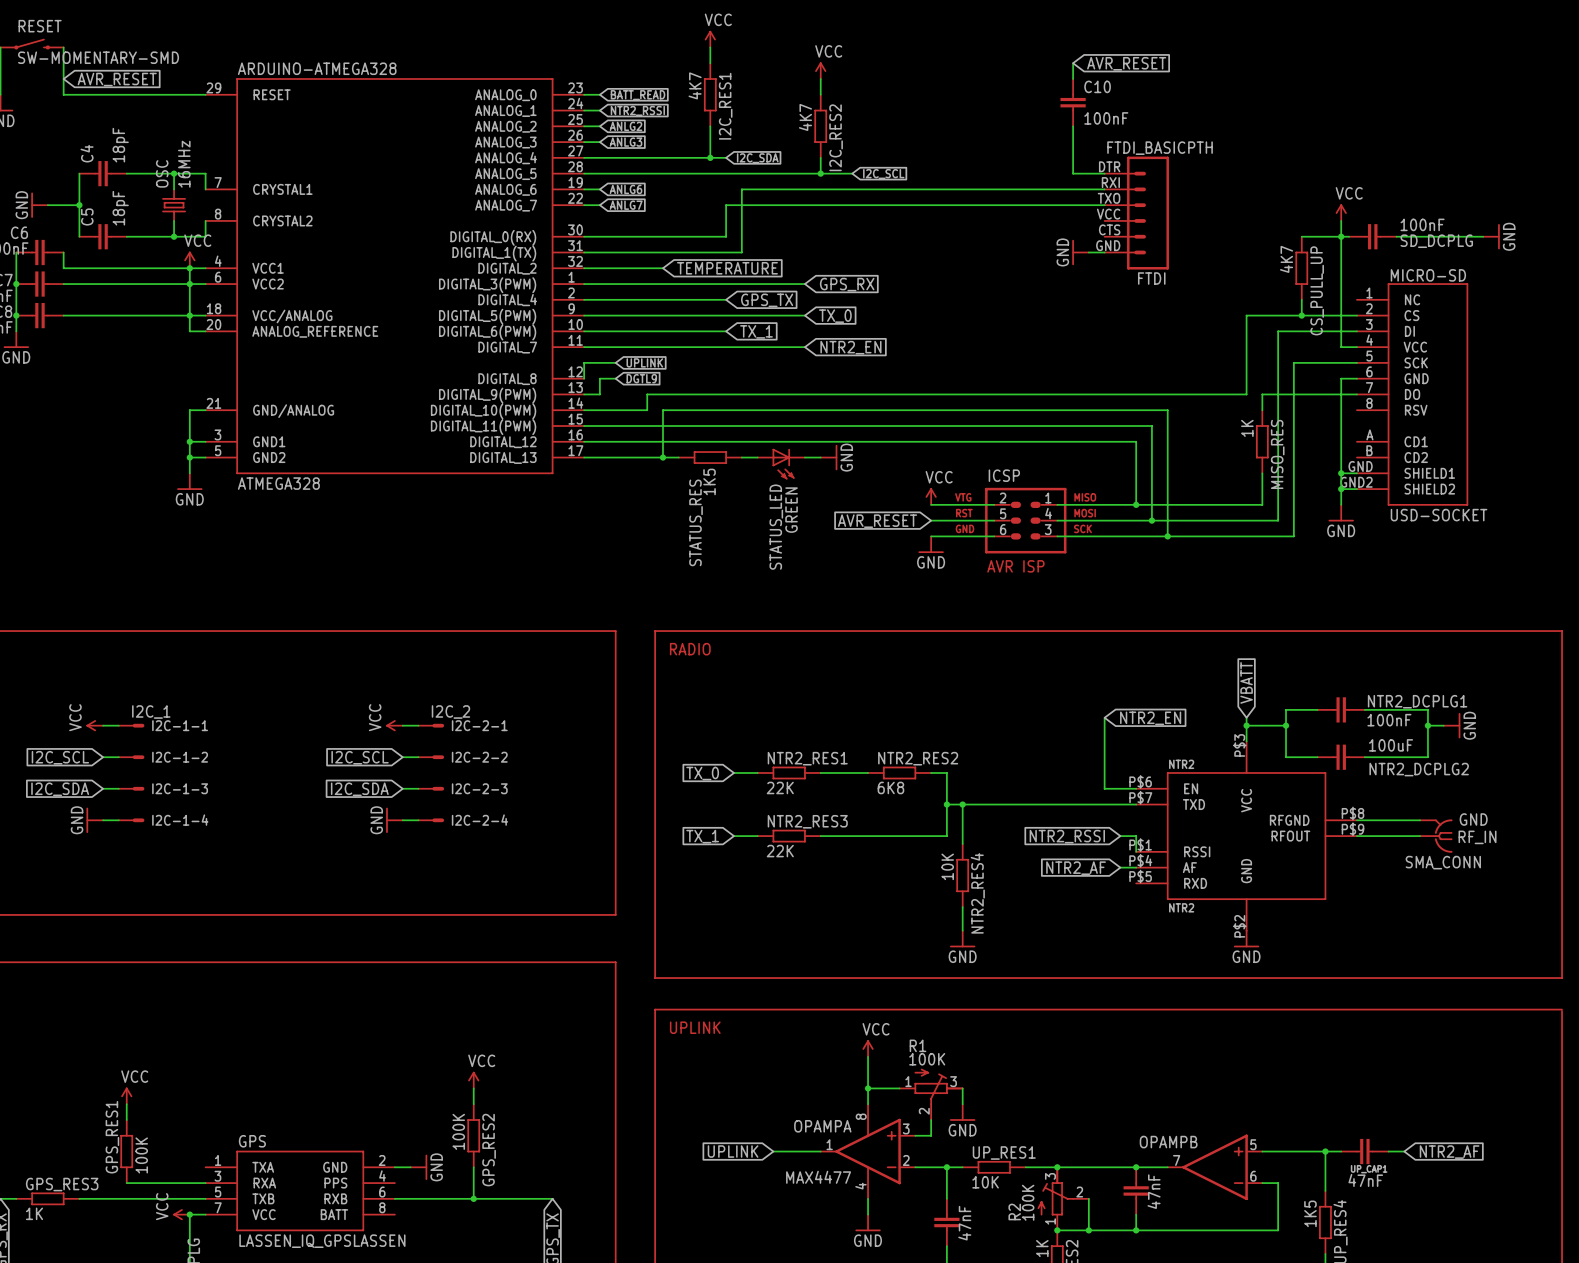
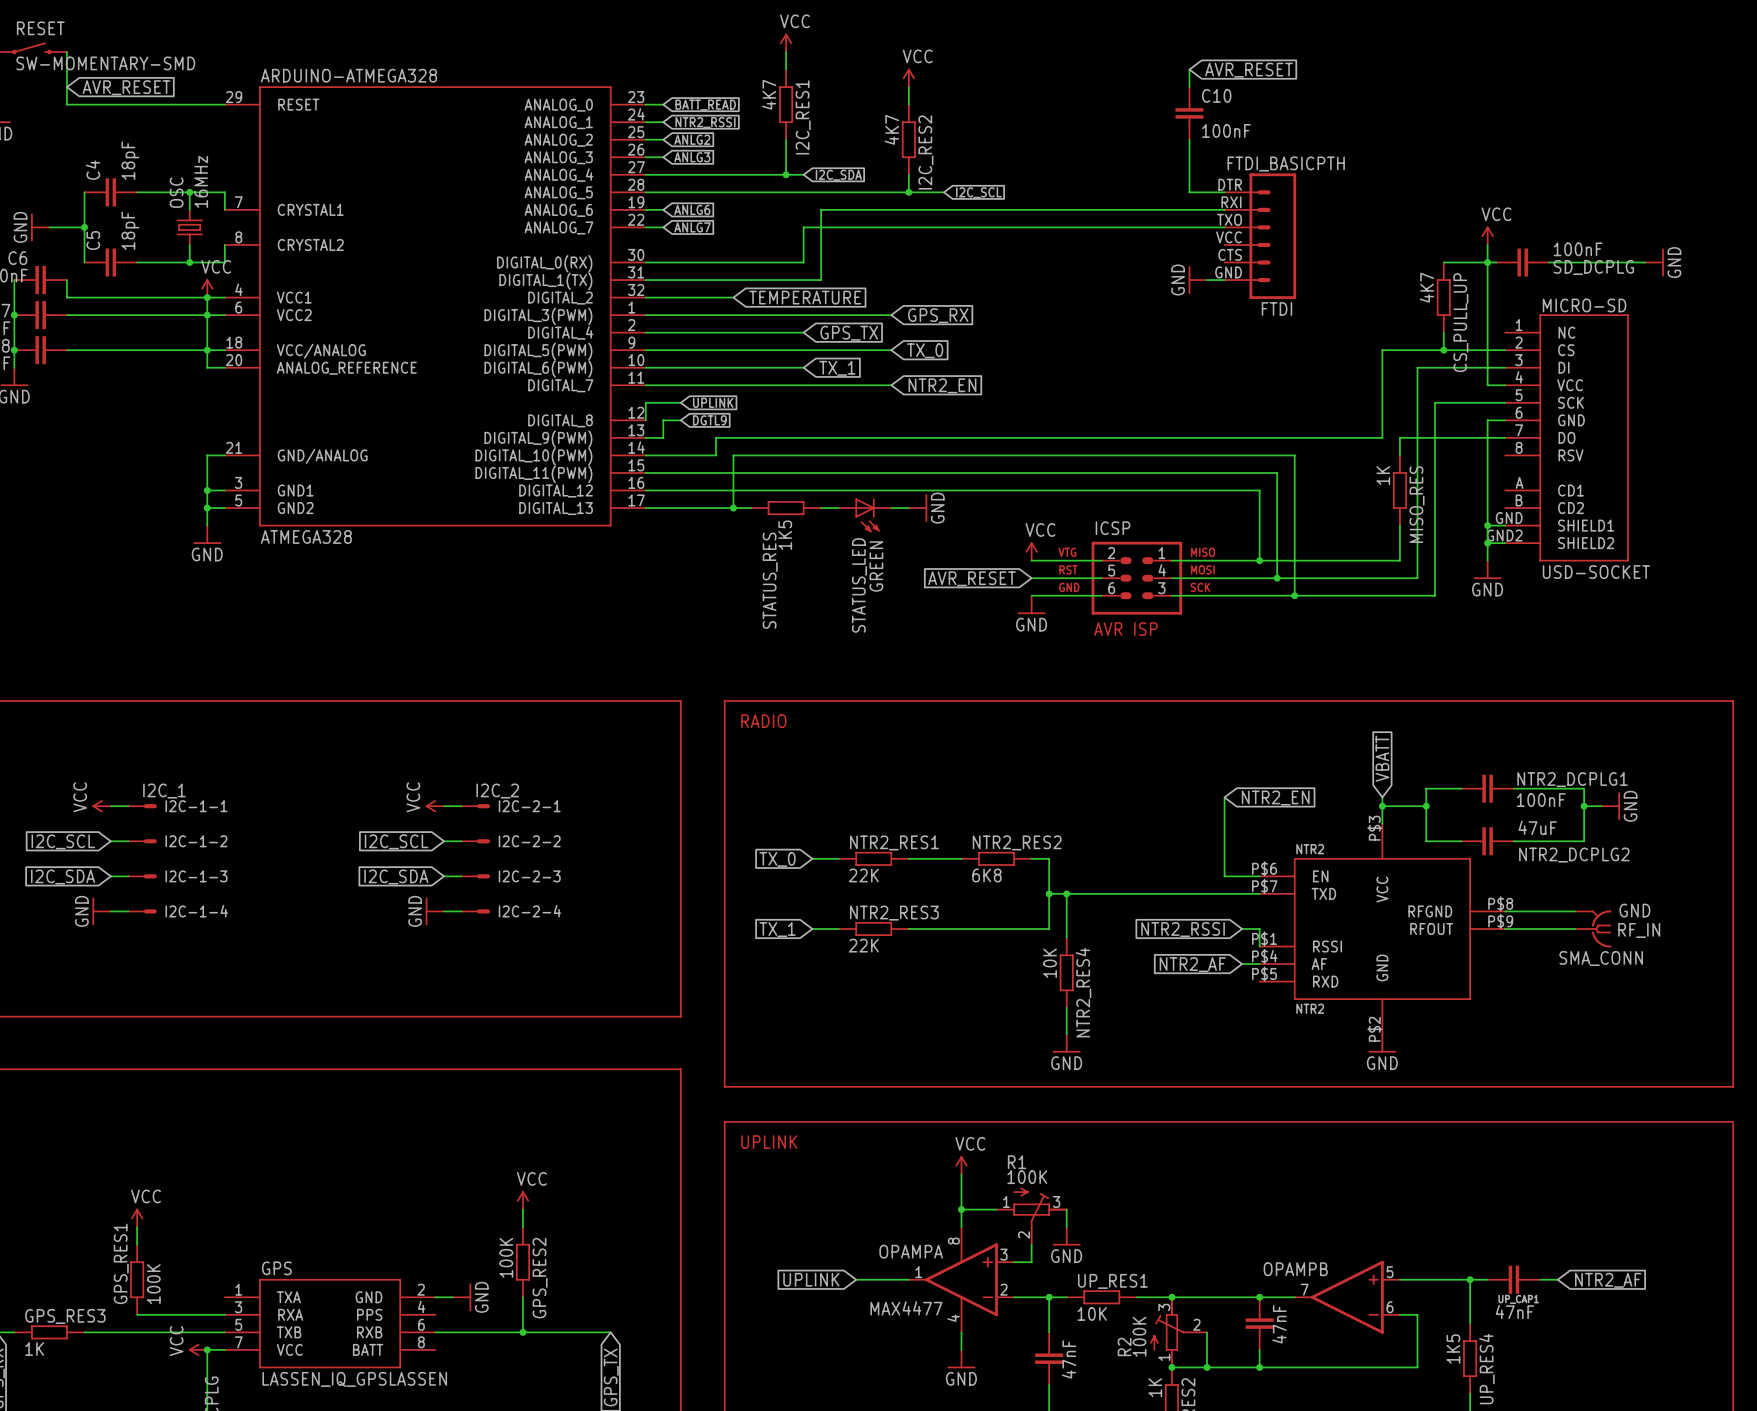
NTR2_DCPLG2 value: 100uF (1391, 745) -> 47uF (1537, 827)

